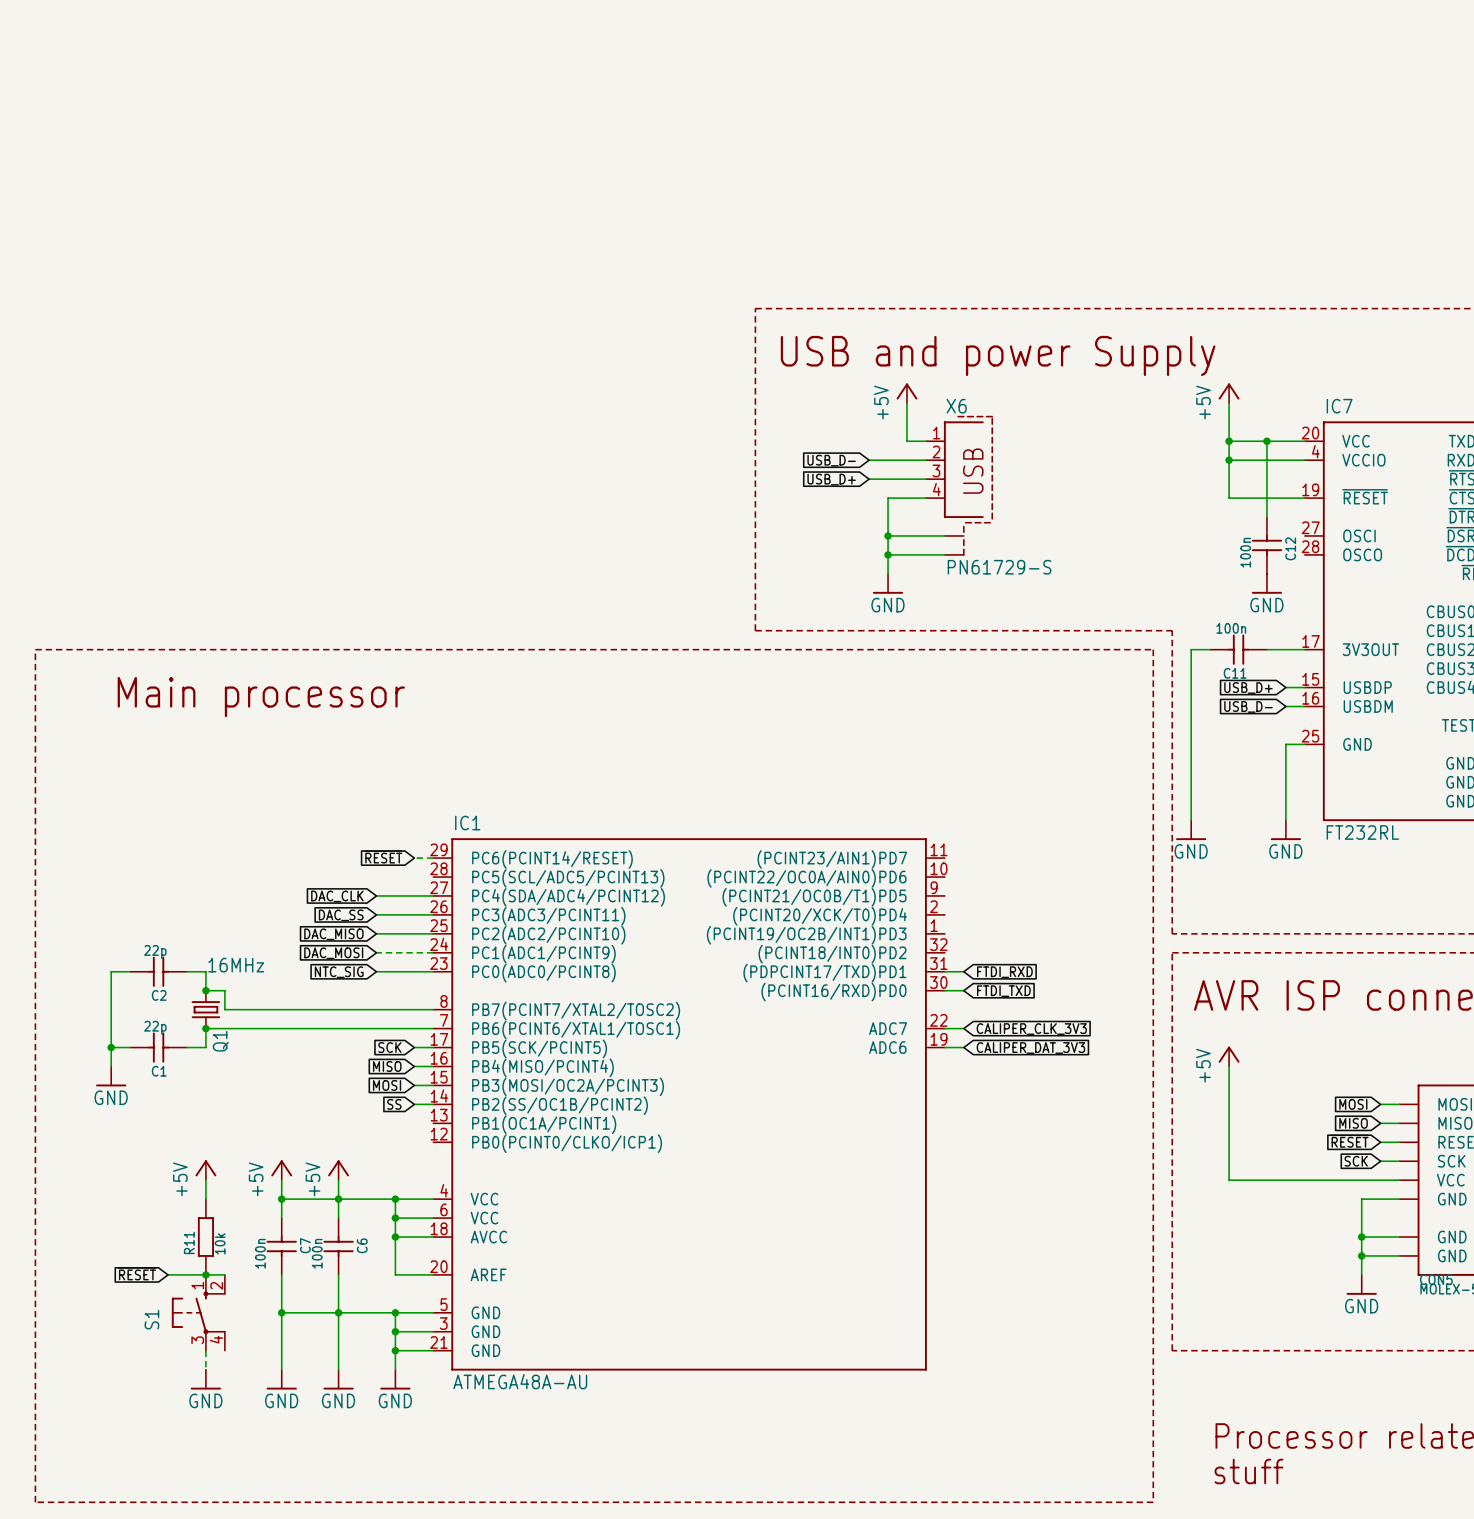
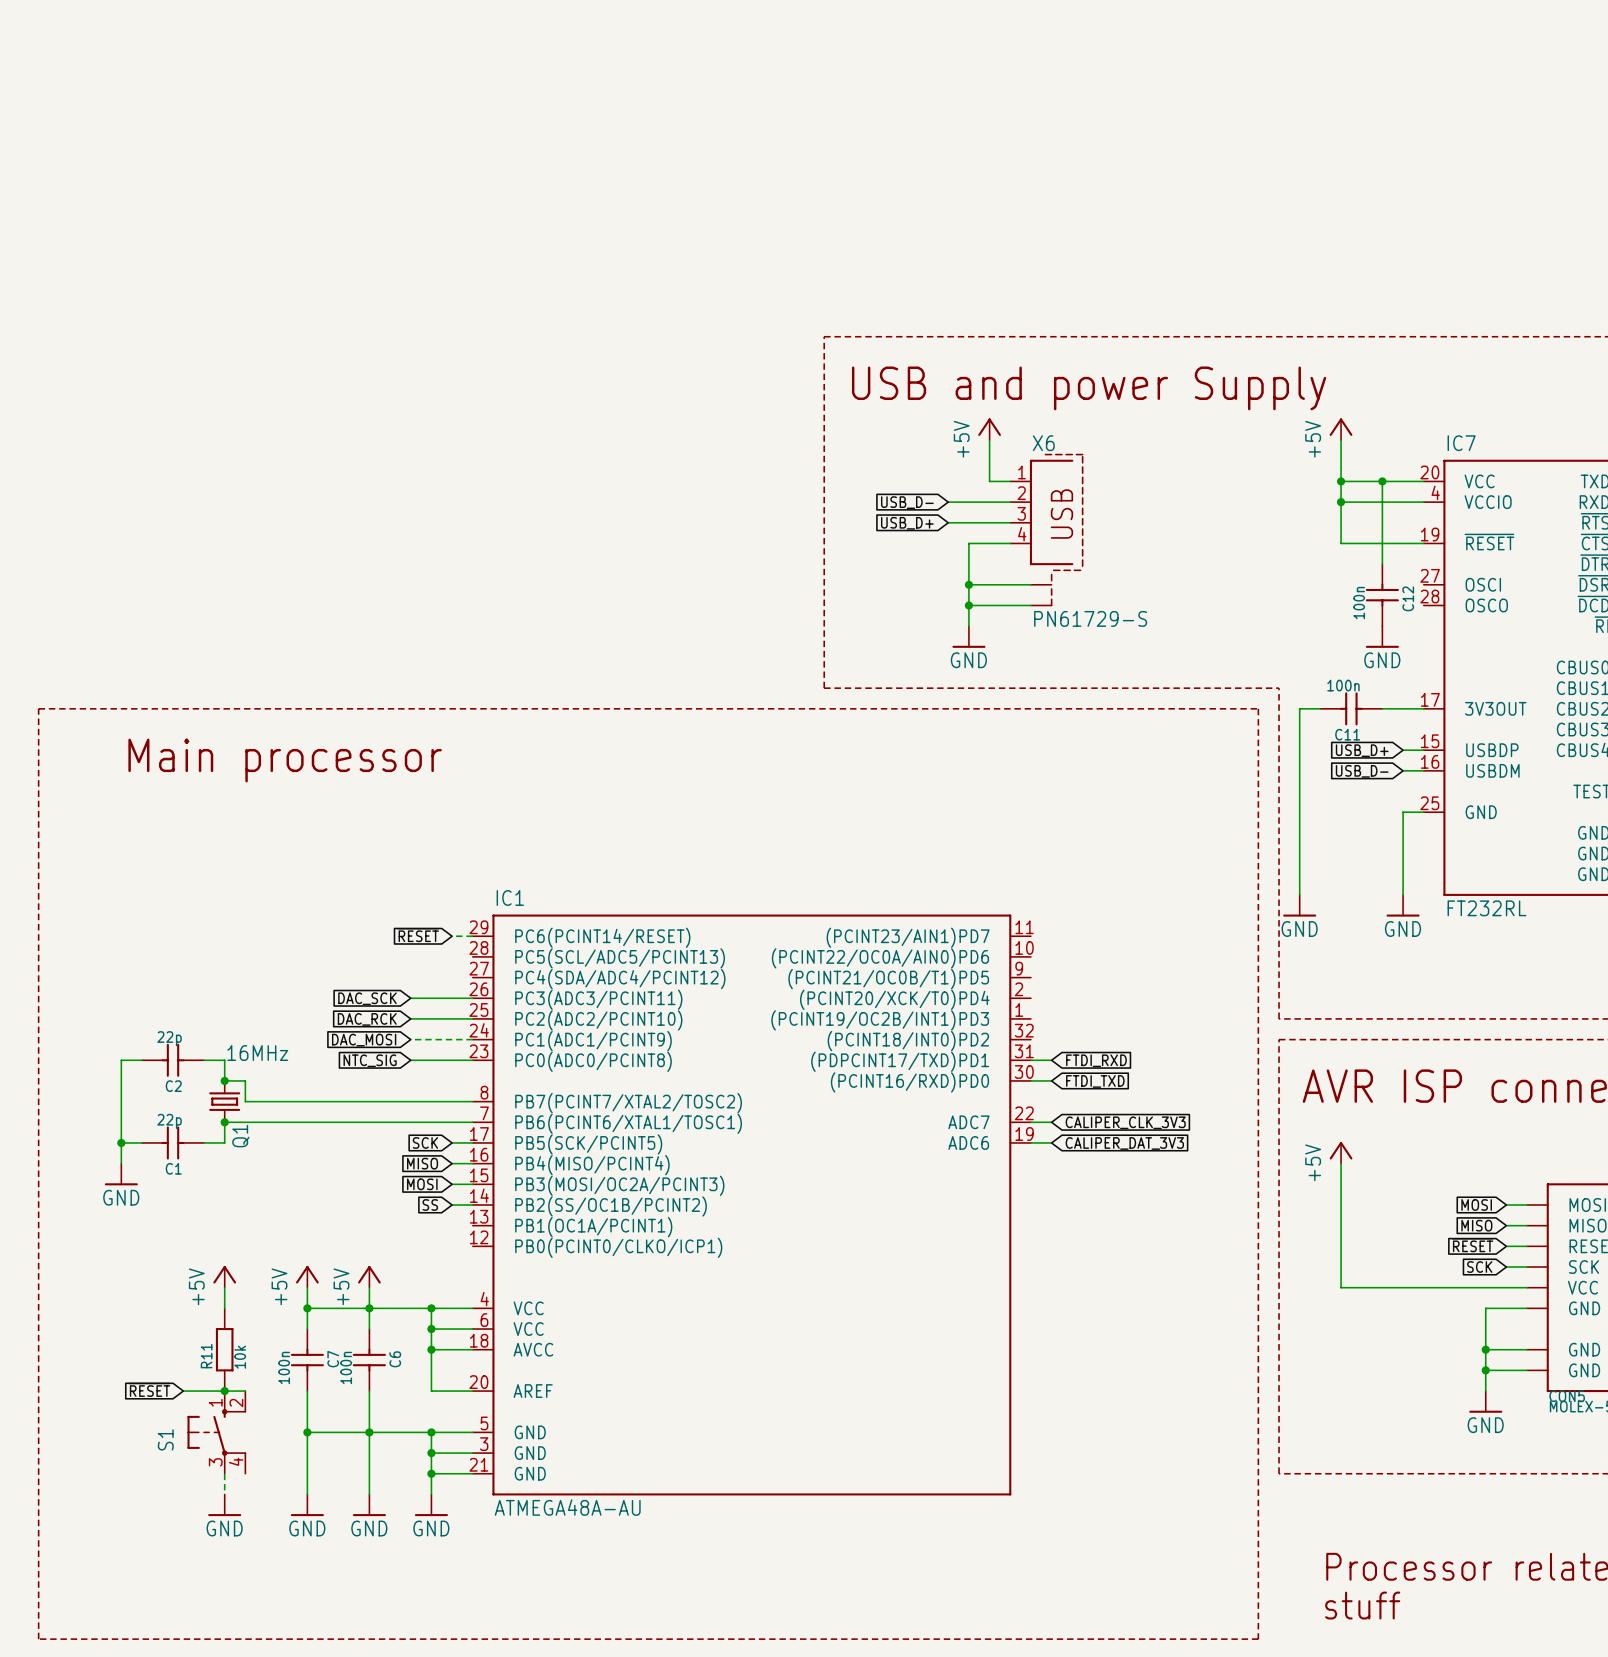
wire: (376, 895) (433, 895) -> none
global label: DAC_CLK (337, 896) -> none
global label: DAC_SS (341, 915) -> DAC_SCK (367, 998)
global label: DAC_MISO (333, 934) -> DAC_RCK (367, 1019)

